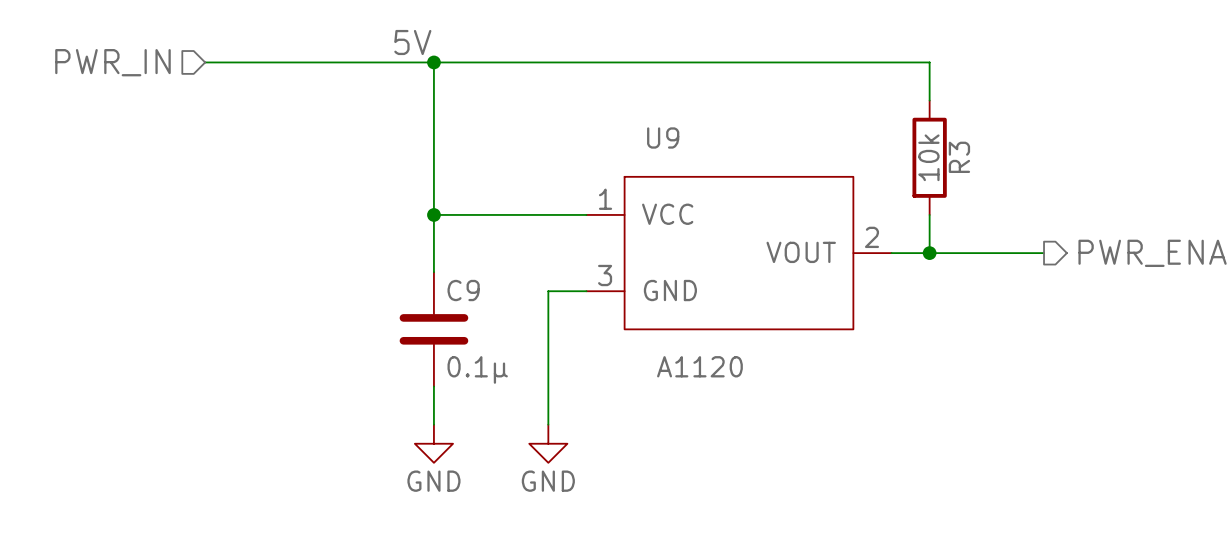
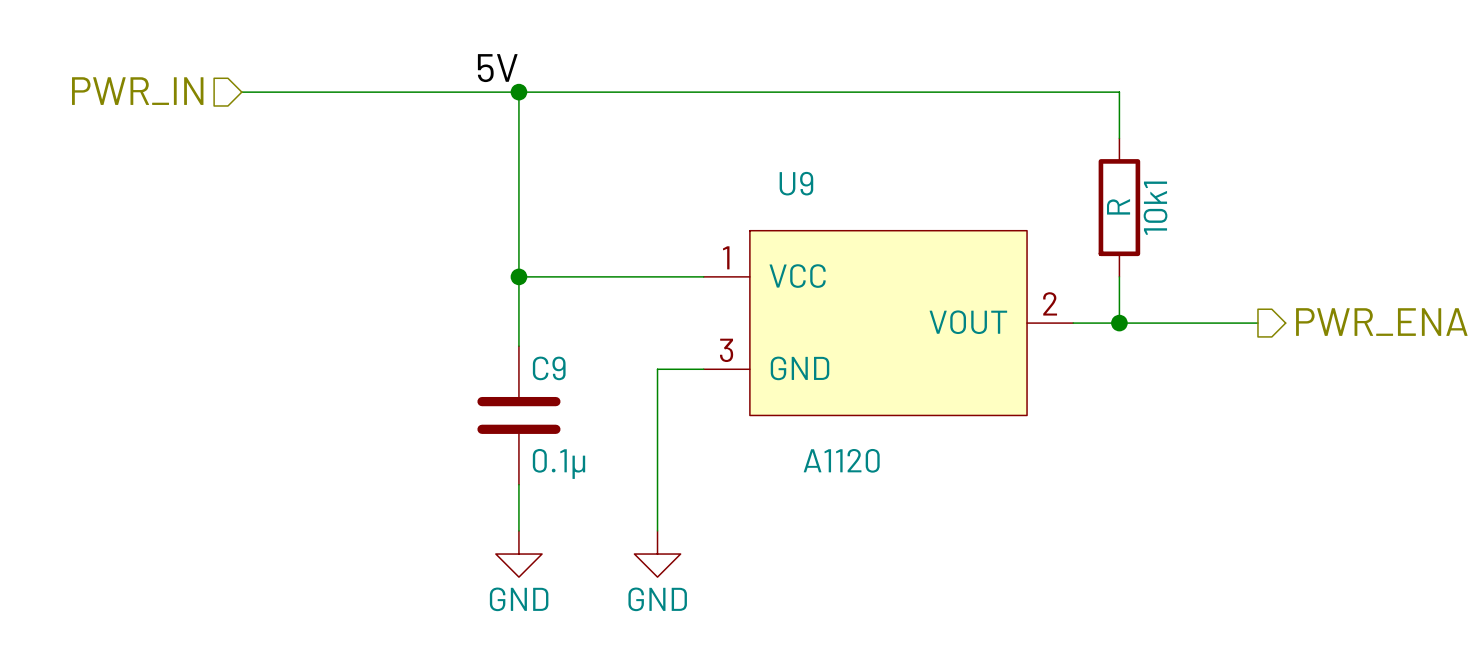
R3 value: 10k (928, 157) -> R (1118, 206)
R3 name: R3 (959, 157) -> 10k1 (1155, 208)

